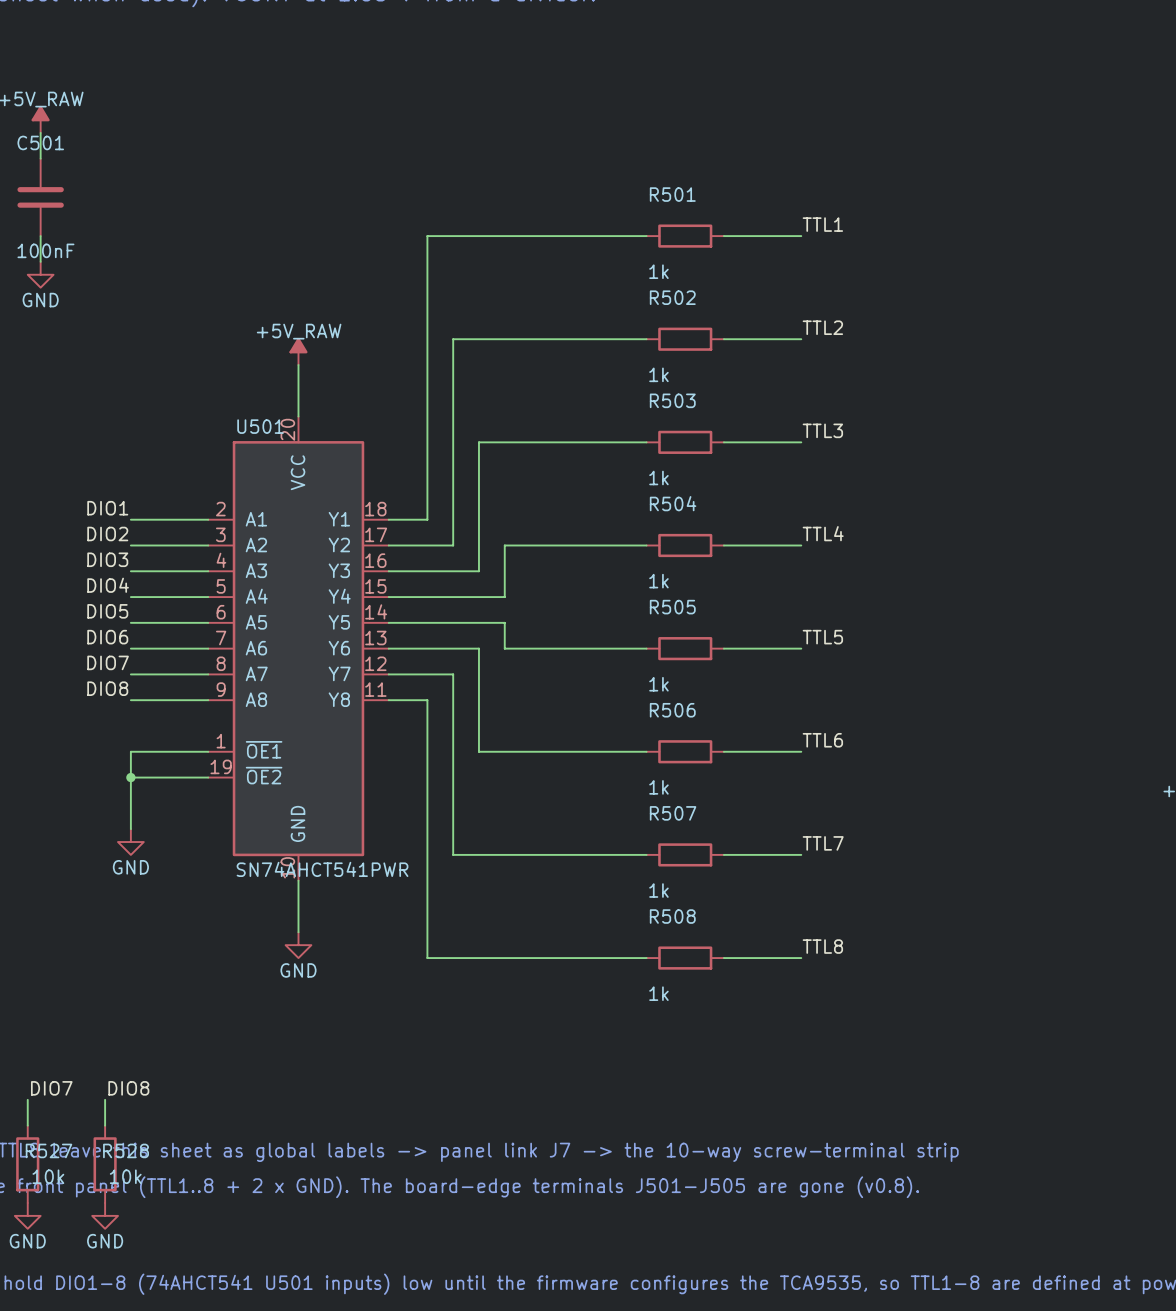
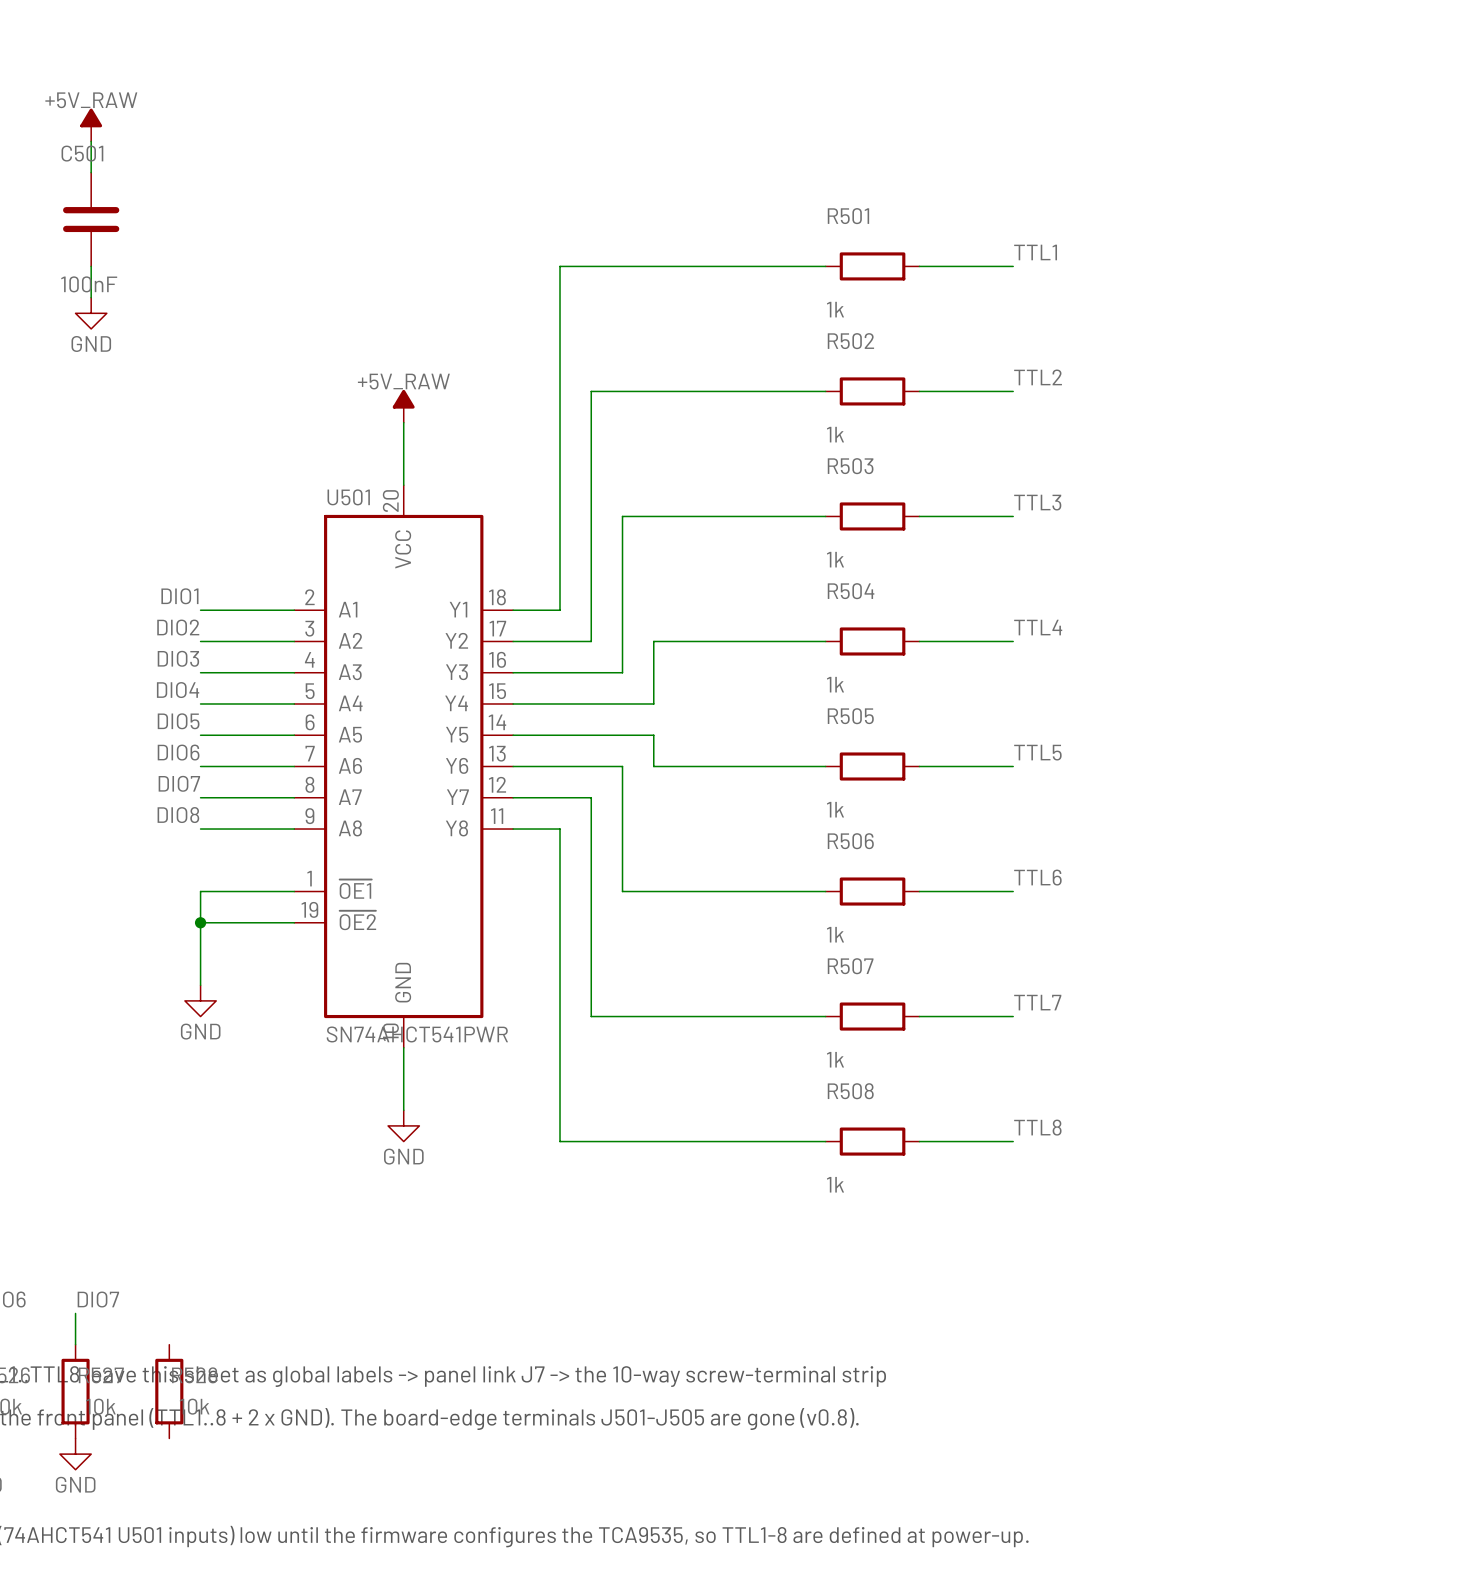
label: DIO8 (128, 1088) -> none
wire: (105, 1099) (105, 1125) -> none
power symbol: GND (105, 1215) -> none

